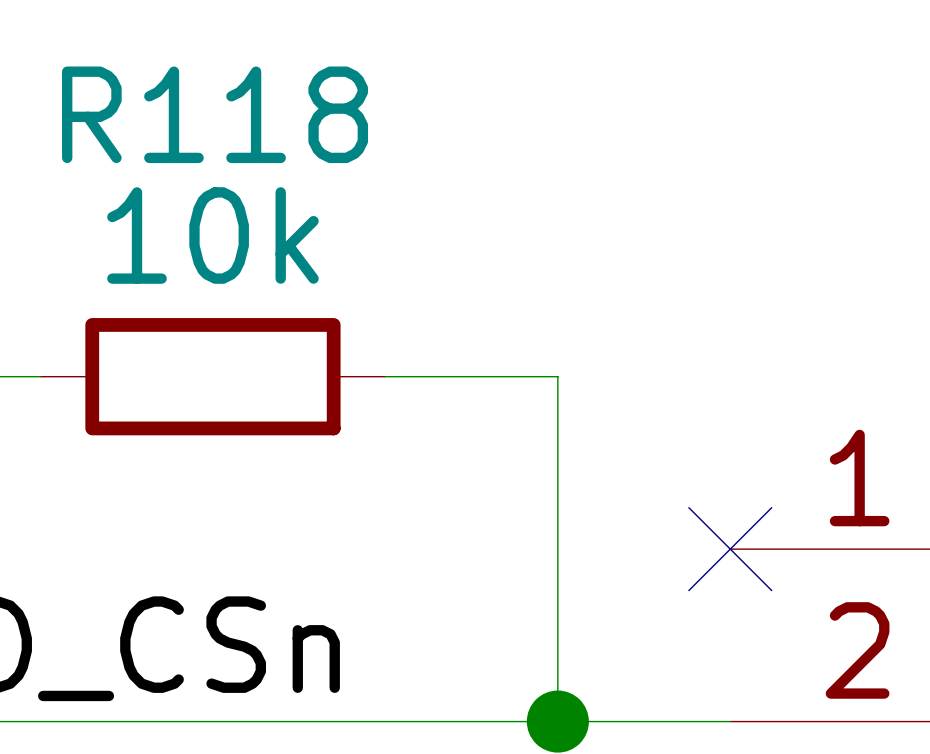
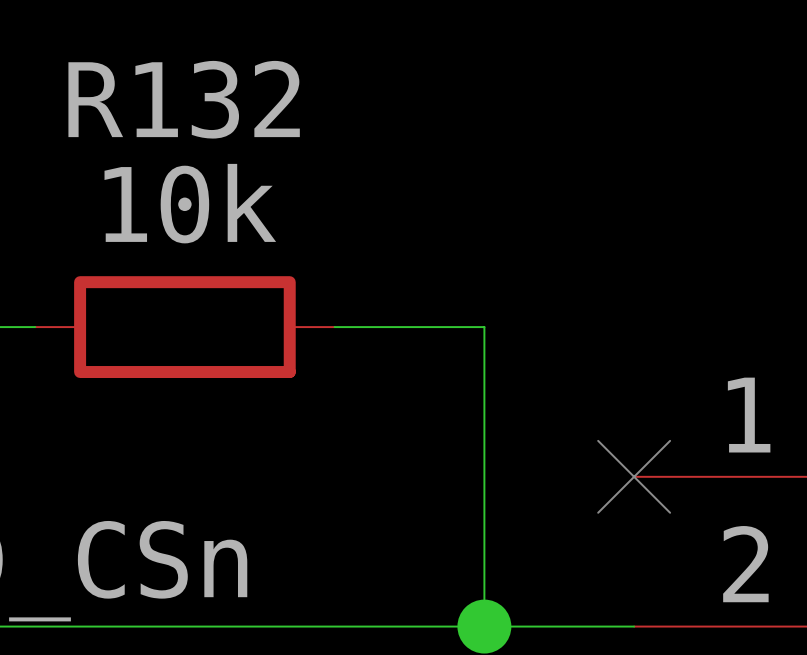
R118 name: R118 (215, 114) -> R132 (184, 99)

